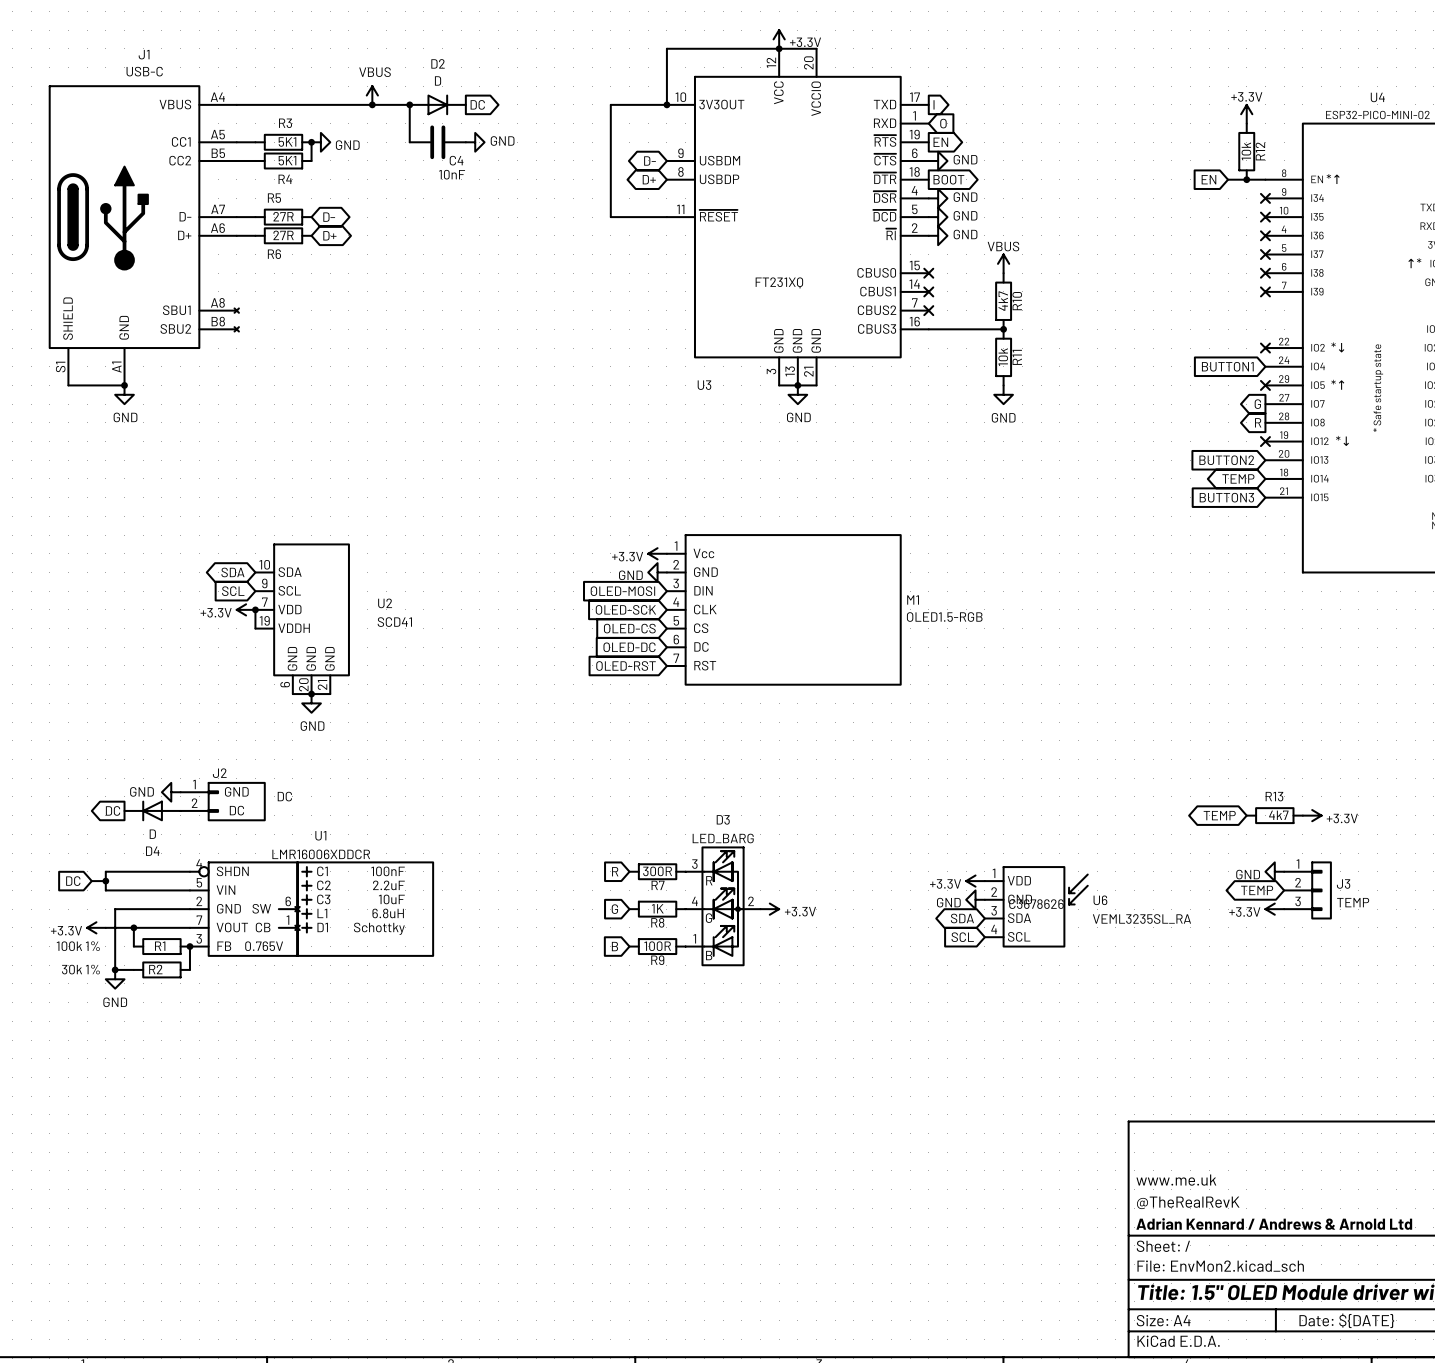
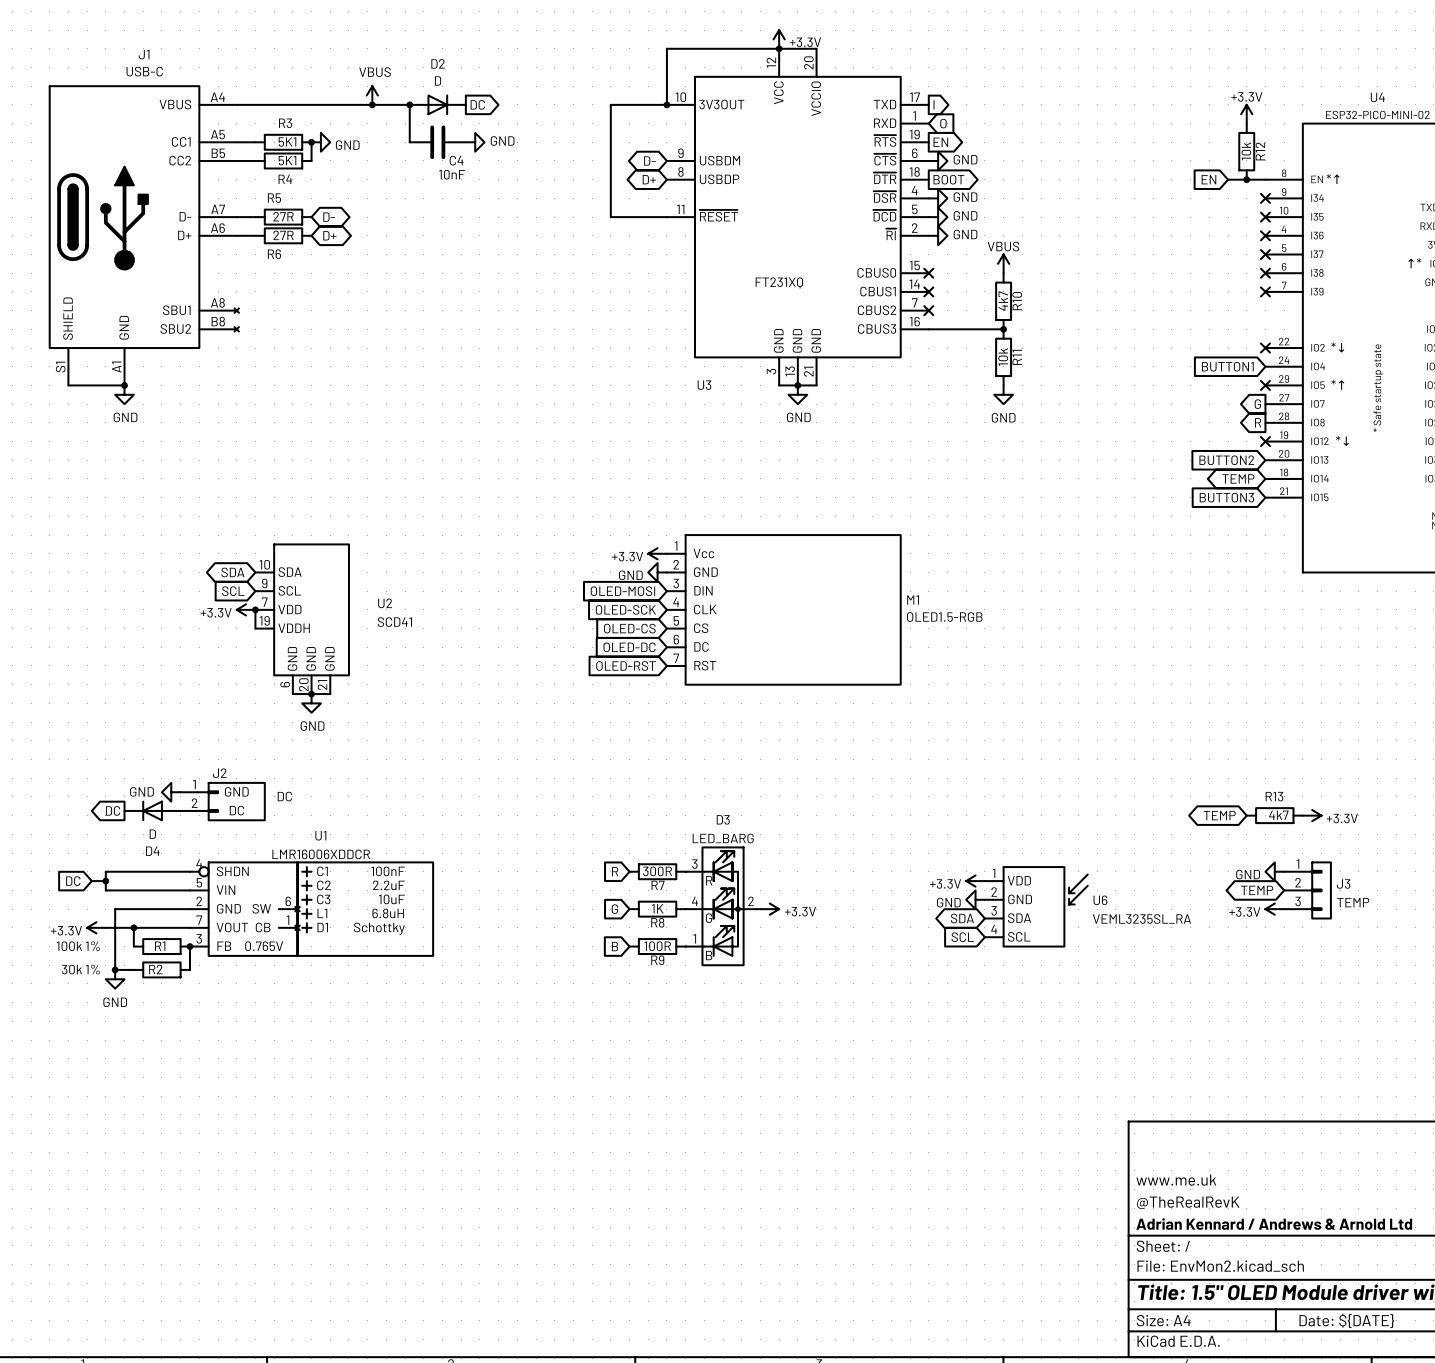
U6 text: C3678626 (1036, 904) -> none

